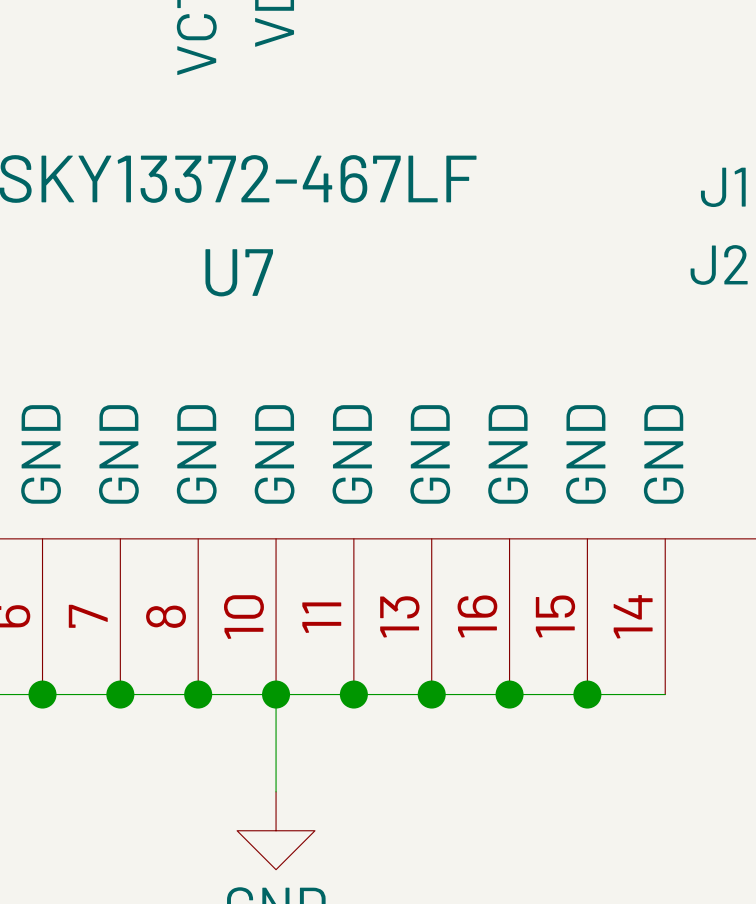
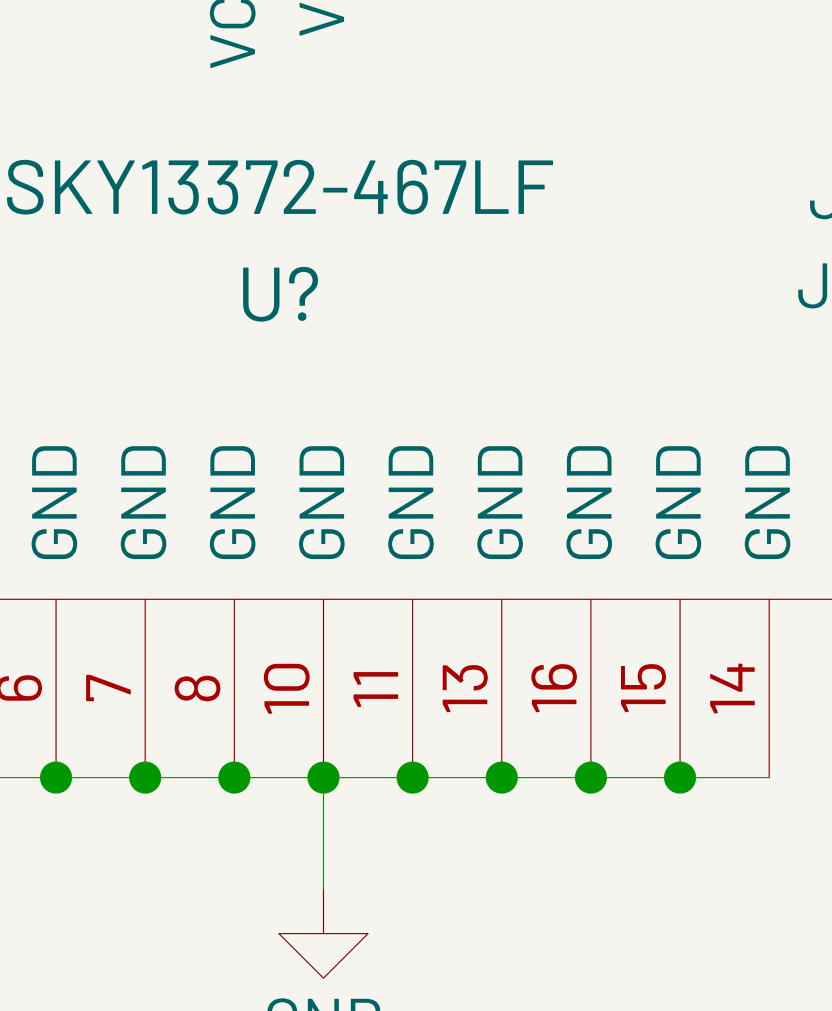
U7 name: U7 (239, 272) -> U? (280, 294)

